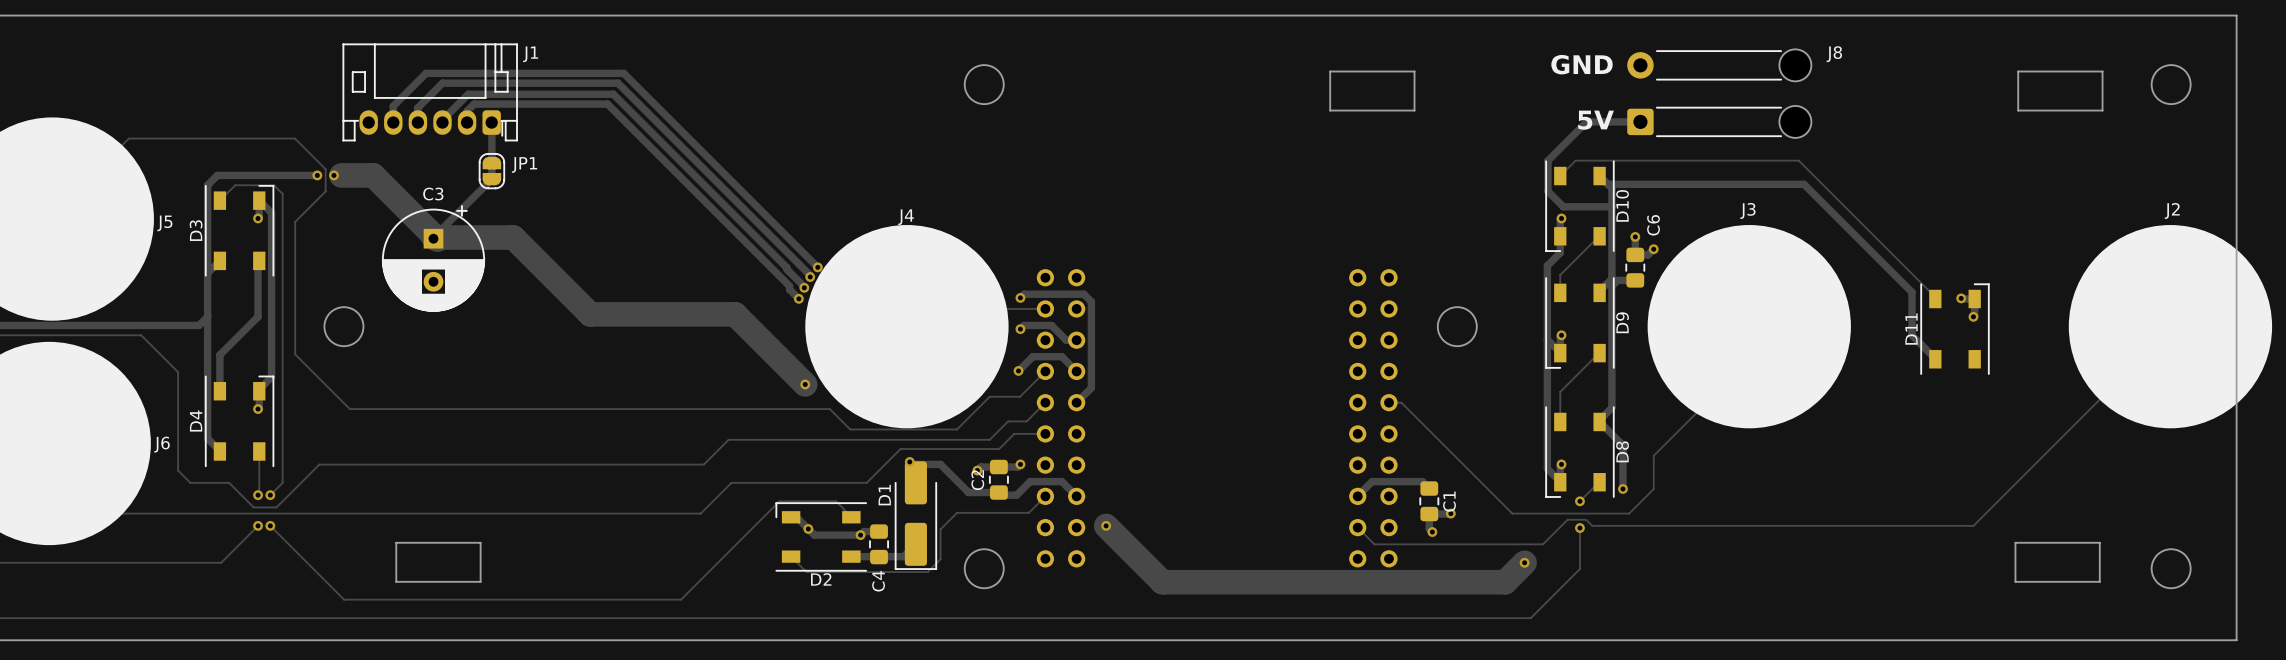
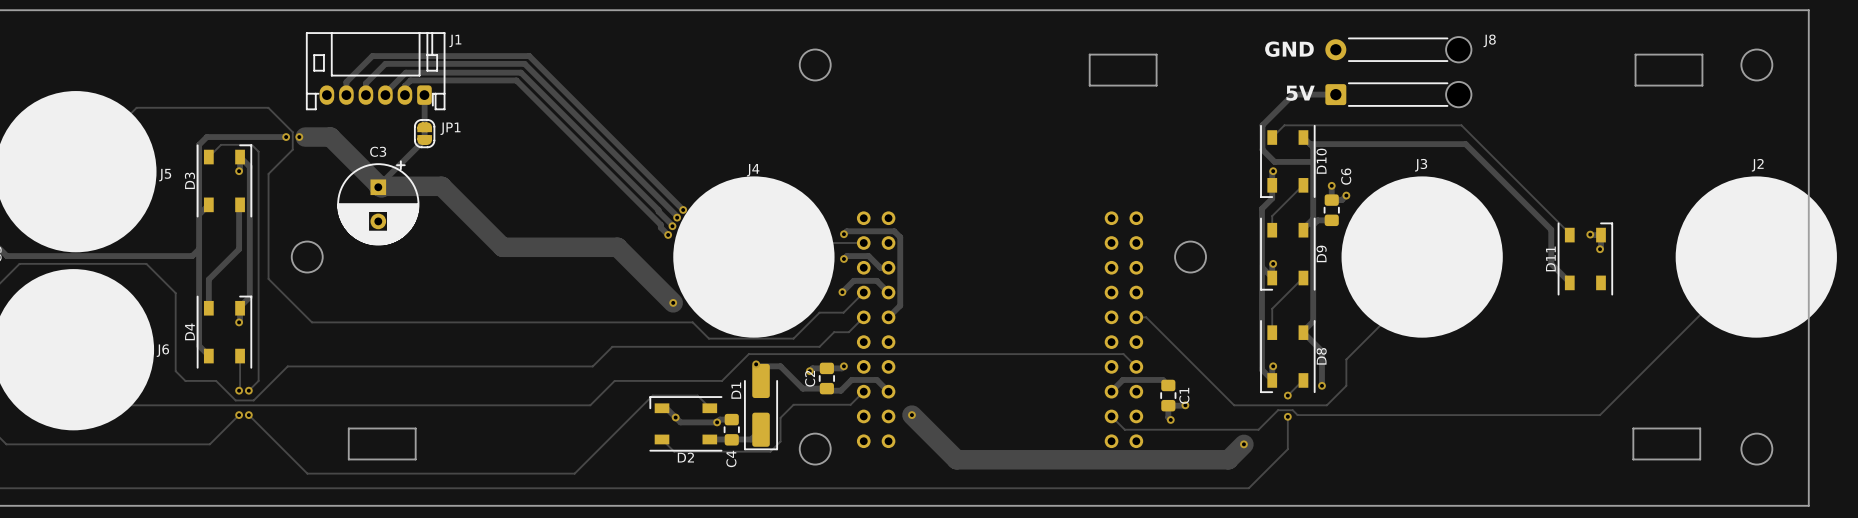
track: (1045, 433) (1014, 433) (999, 449) -> (1136, 366) (1123, 354) (827, 354)

